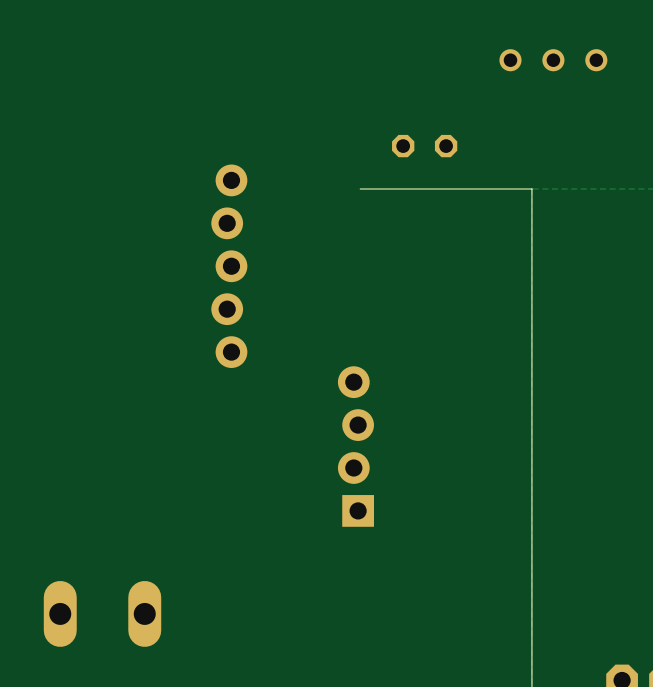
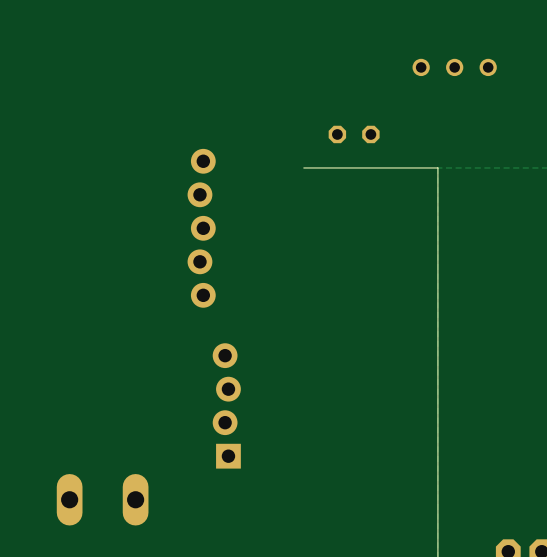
part position: (355, 446) -> (226, 405)

